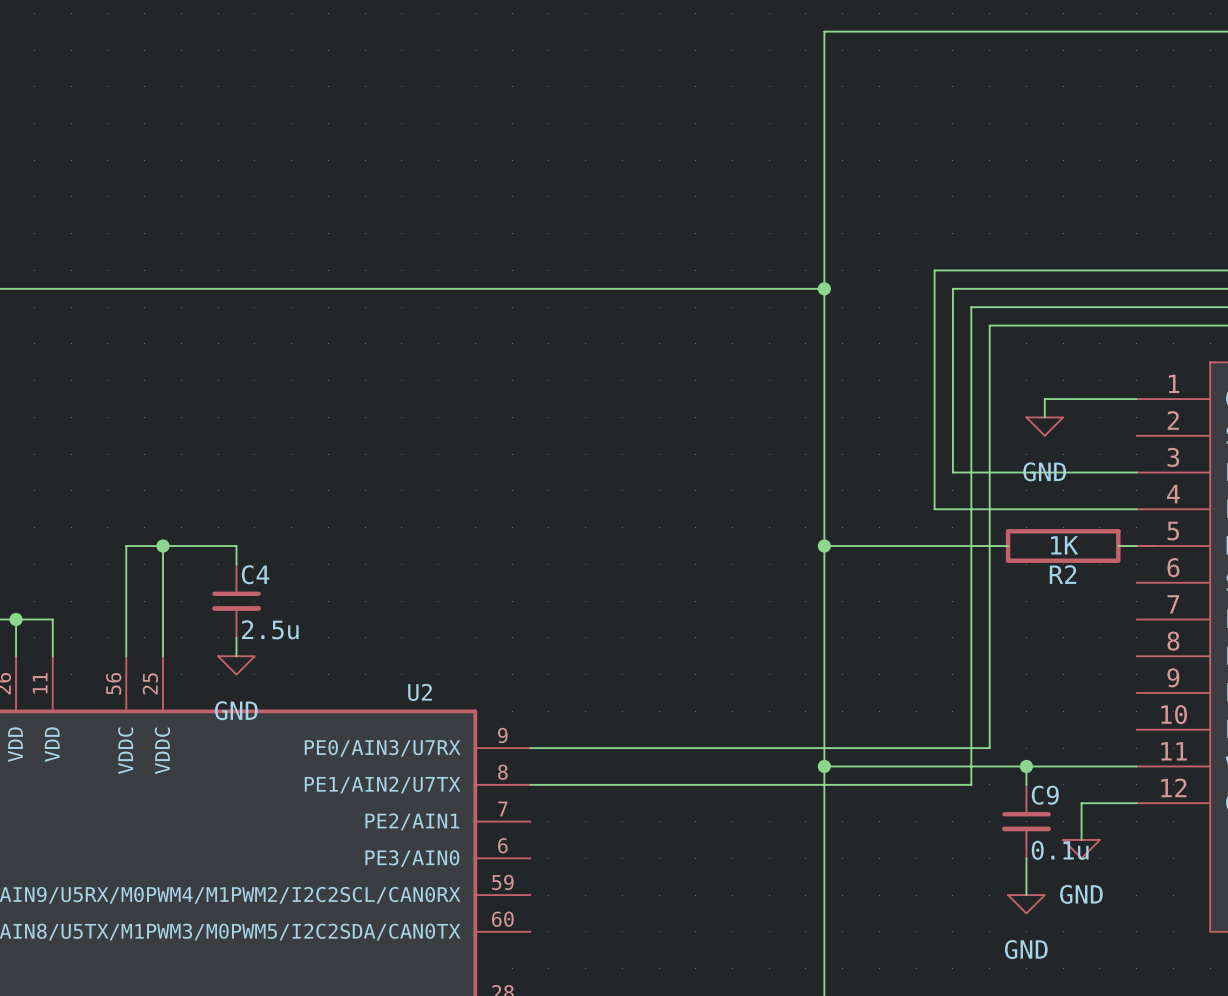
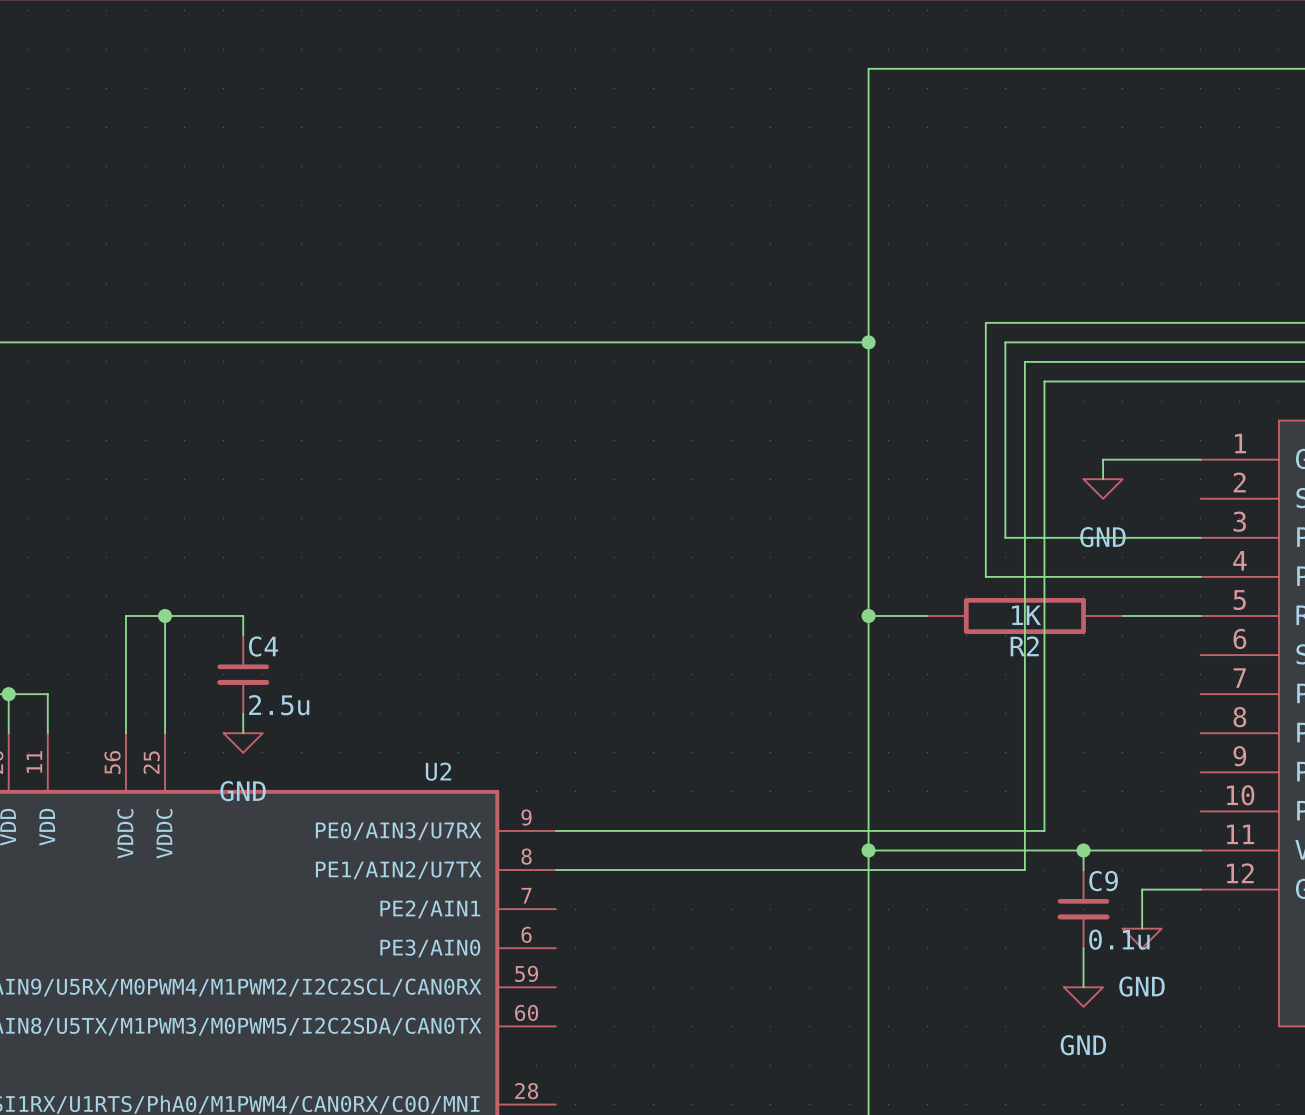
wire: (879, 546) (1008, 546) -> none
wire: none -> (1122, 615) (1181, 615)
R2 position: (1063, 546) -> (1024, 615)

